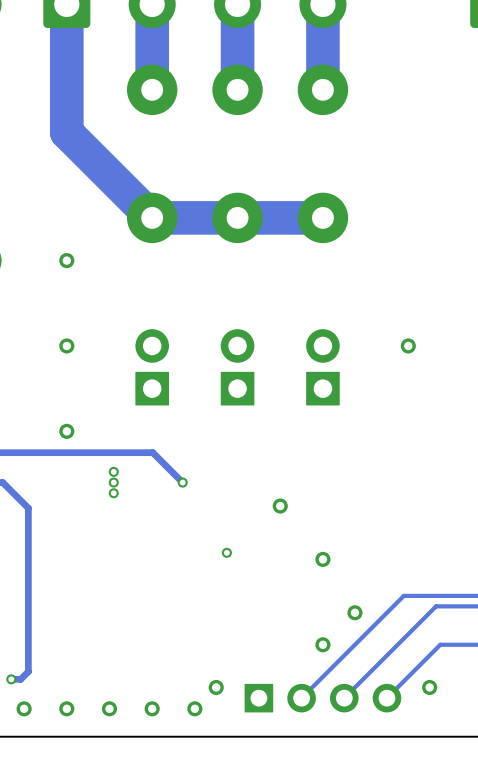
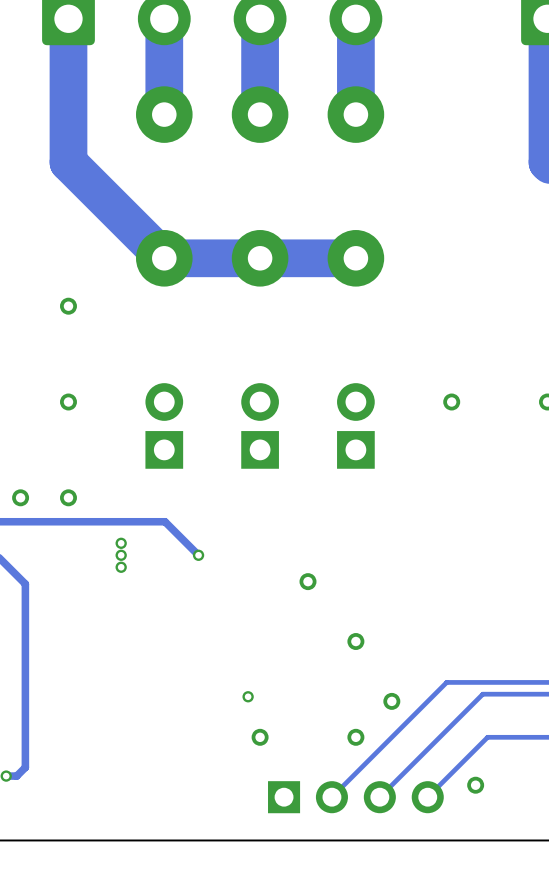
via: none -> (20, 497)
via position: (226, 552) -> (248, 696)
via: none -> (260, 737)
via: (216, 687) -> none
via: (24, 708) -> none
via: (66, 708) -> none
via: (109, 708) -> none
via: (152, 708) -> none
via: (194, 708) -> none

